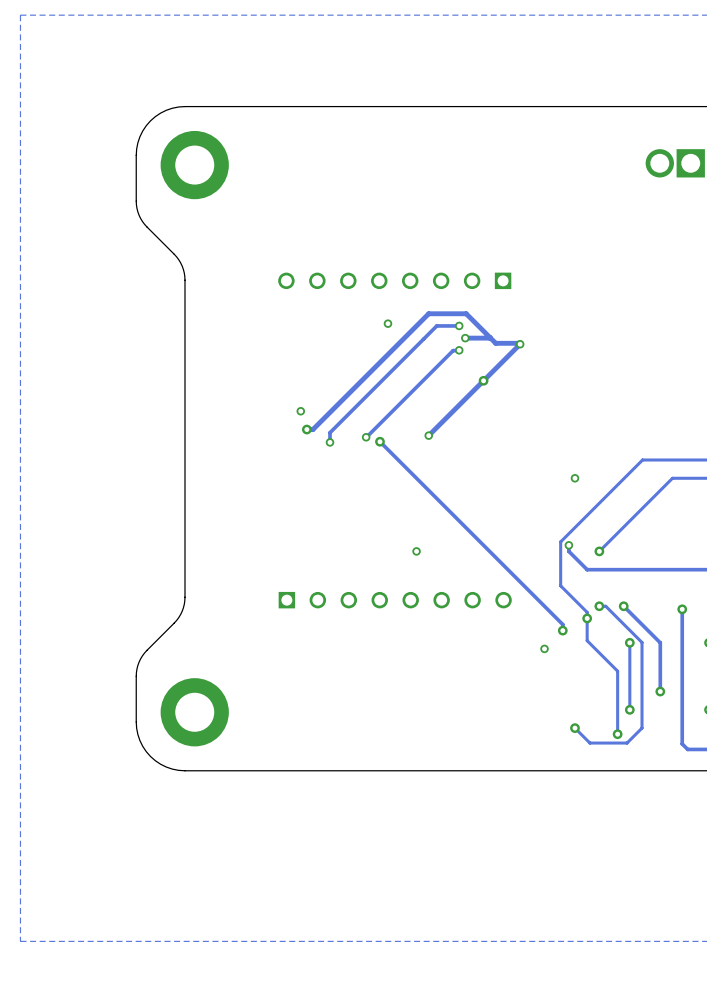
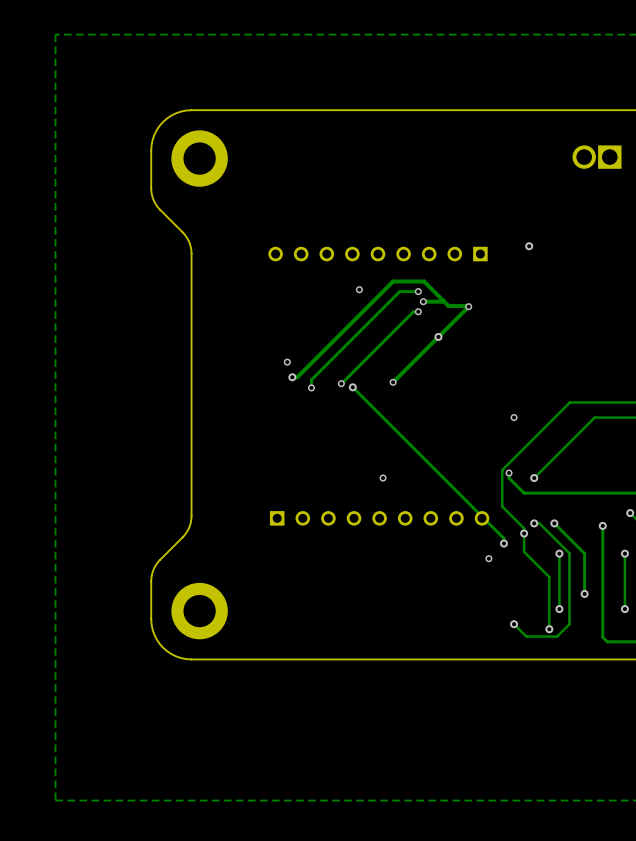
via: none -> (529, 246)
part: (394, 280) -> none
part: none -> (378, 254)
part: (395, 600) -> none
part: none -> (379, 518)

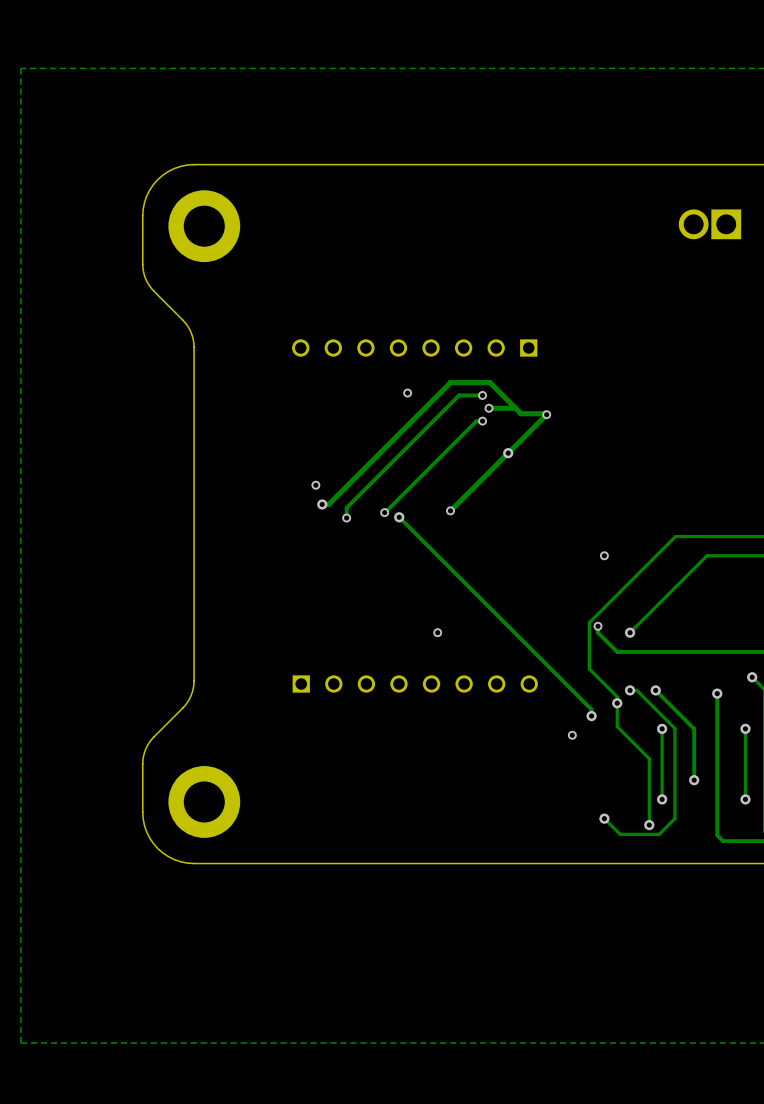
via: (529, 246) -> none
part: none -> (414, 348)
part: (378, 254) -> none
part: none -> (415, 683)
part: (379, 518) -> none

